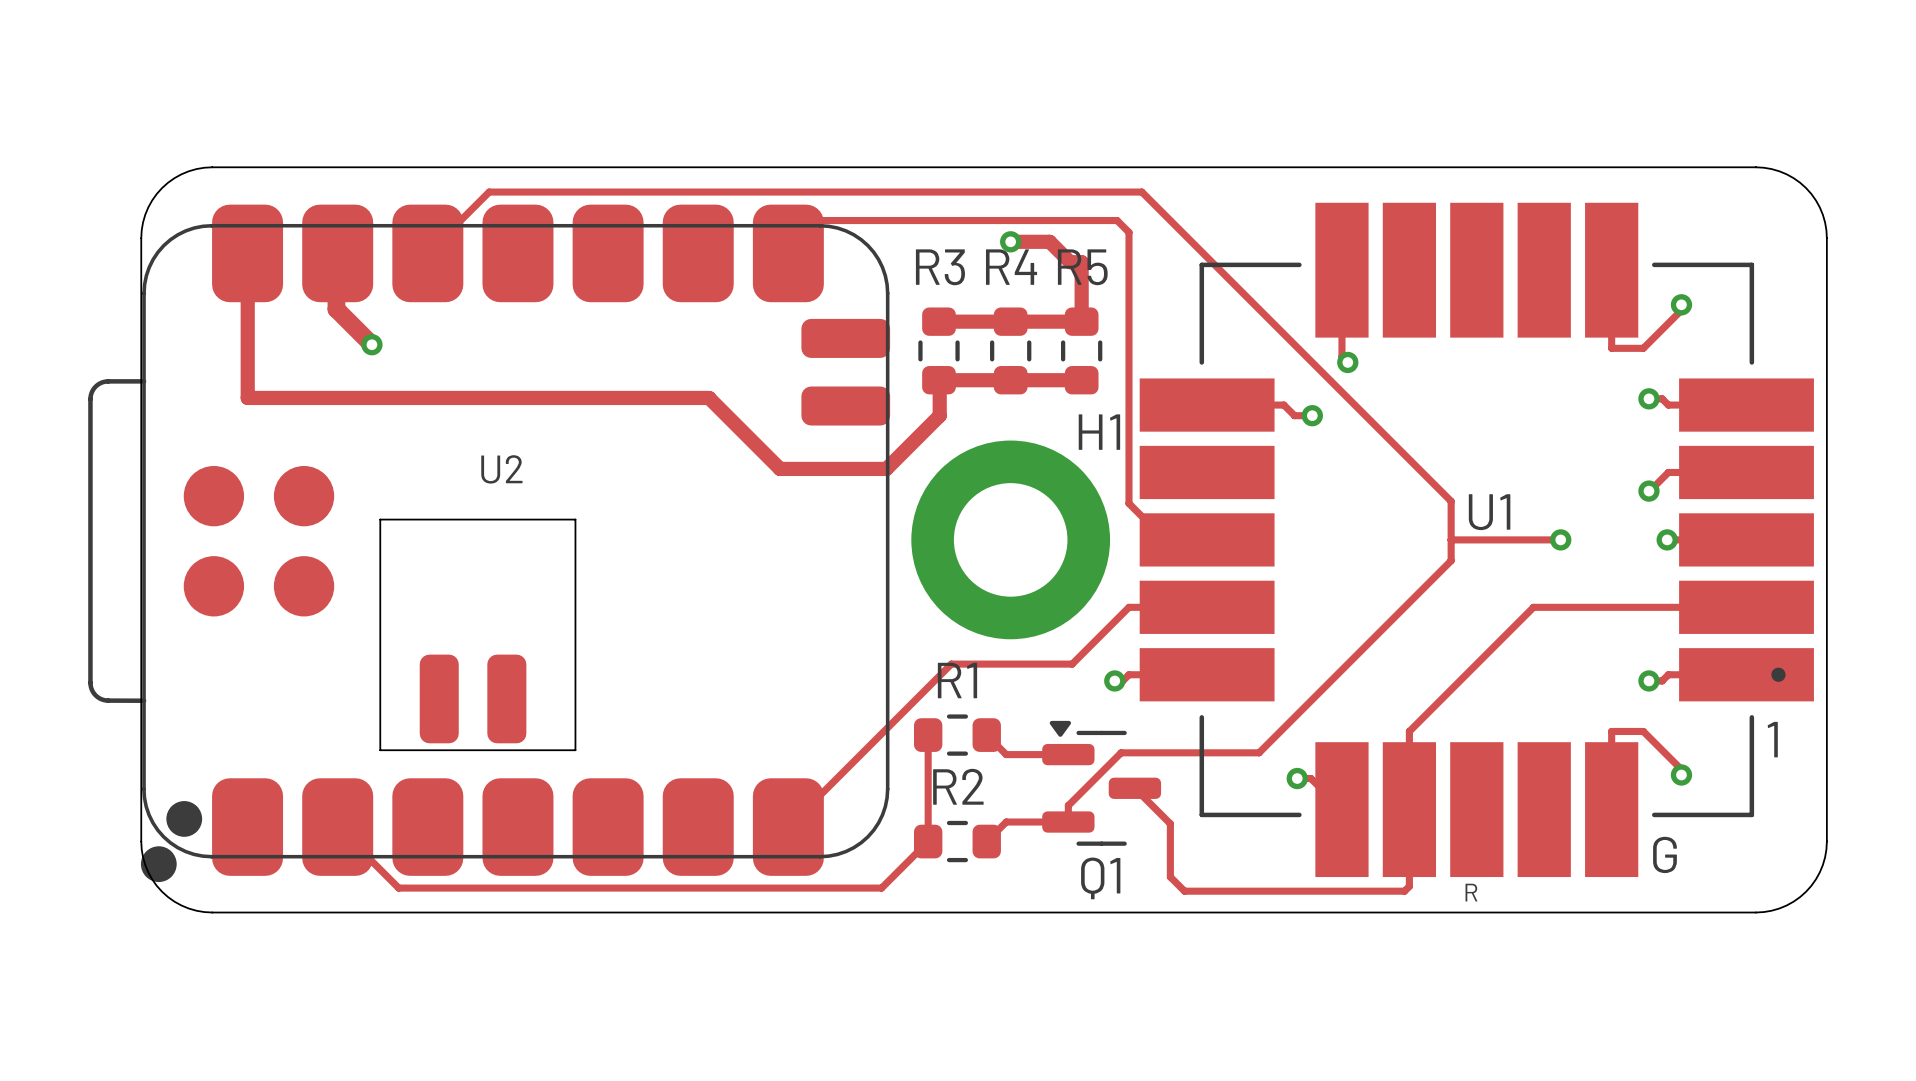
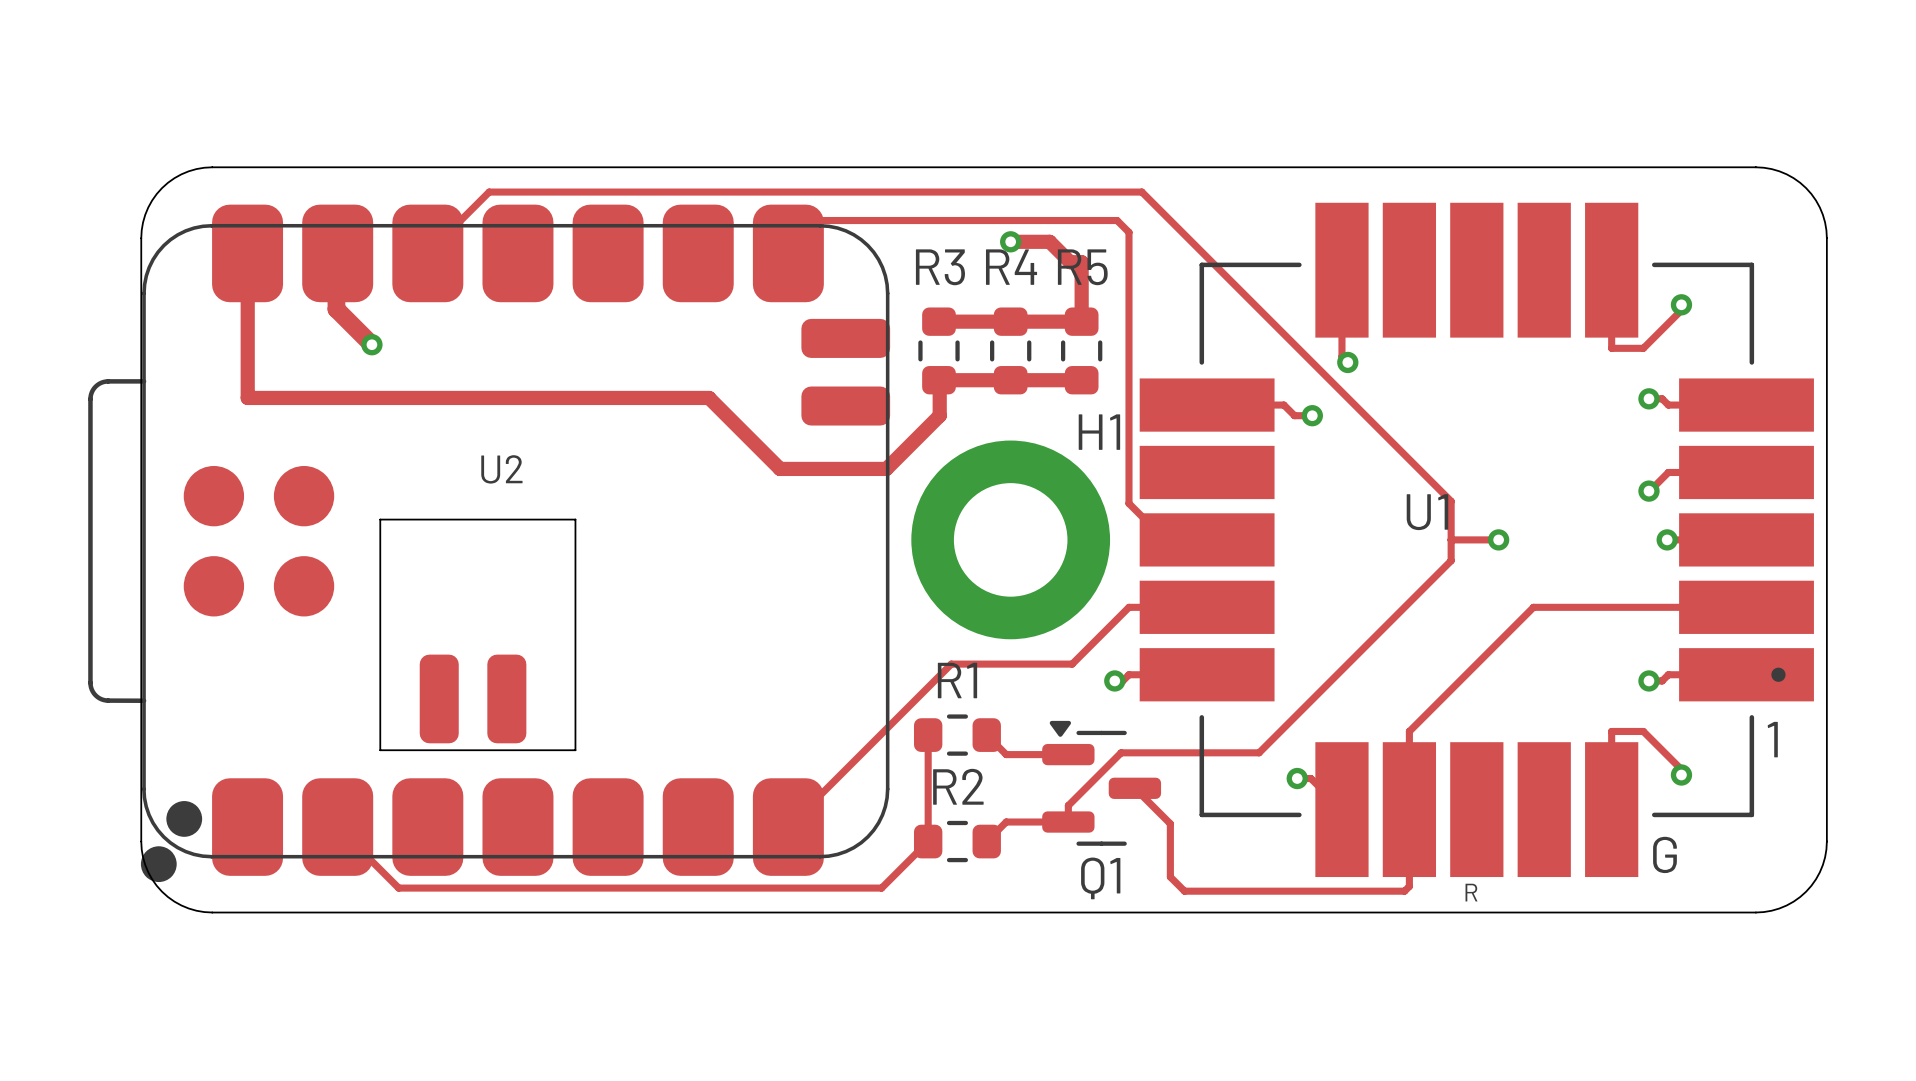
U1 name position: U1 (1489, 512) -> U1 (1427, 512)
track: (1498, 539) (1560, 539) -> none
via position: (1560, 539) -> (1498, 539)

